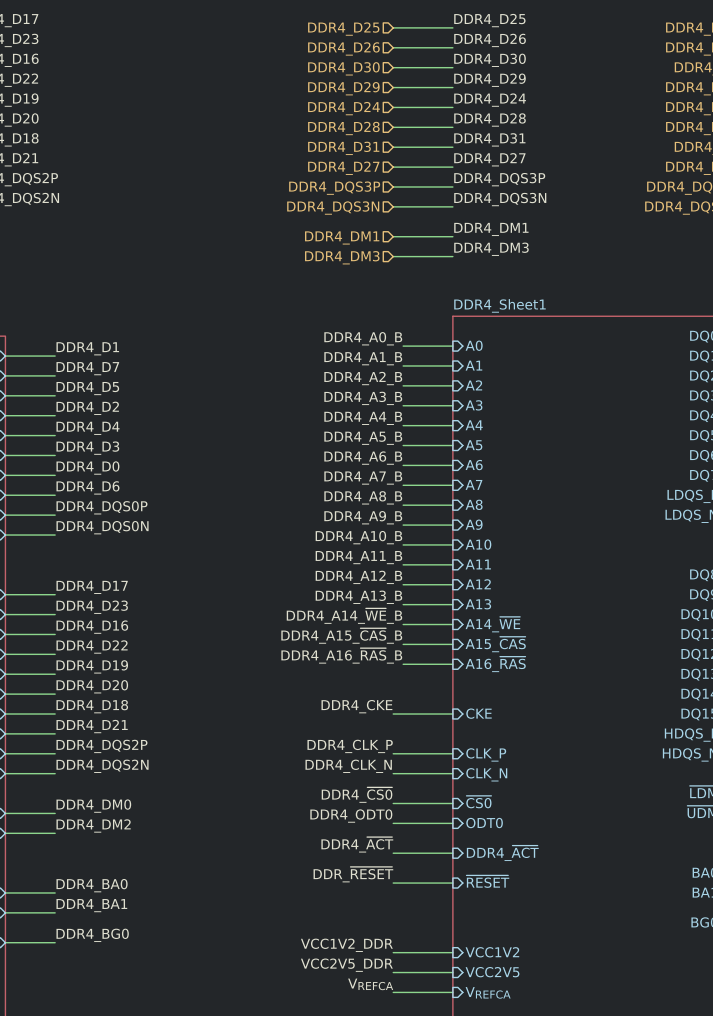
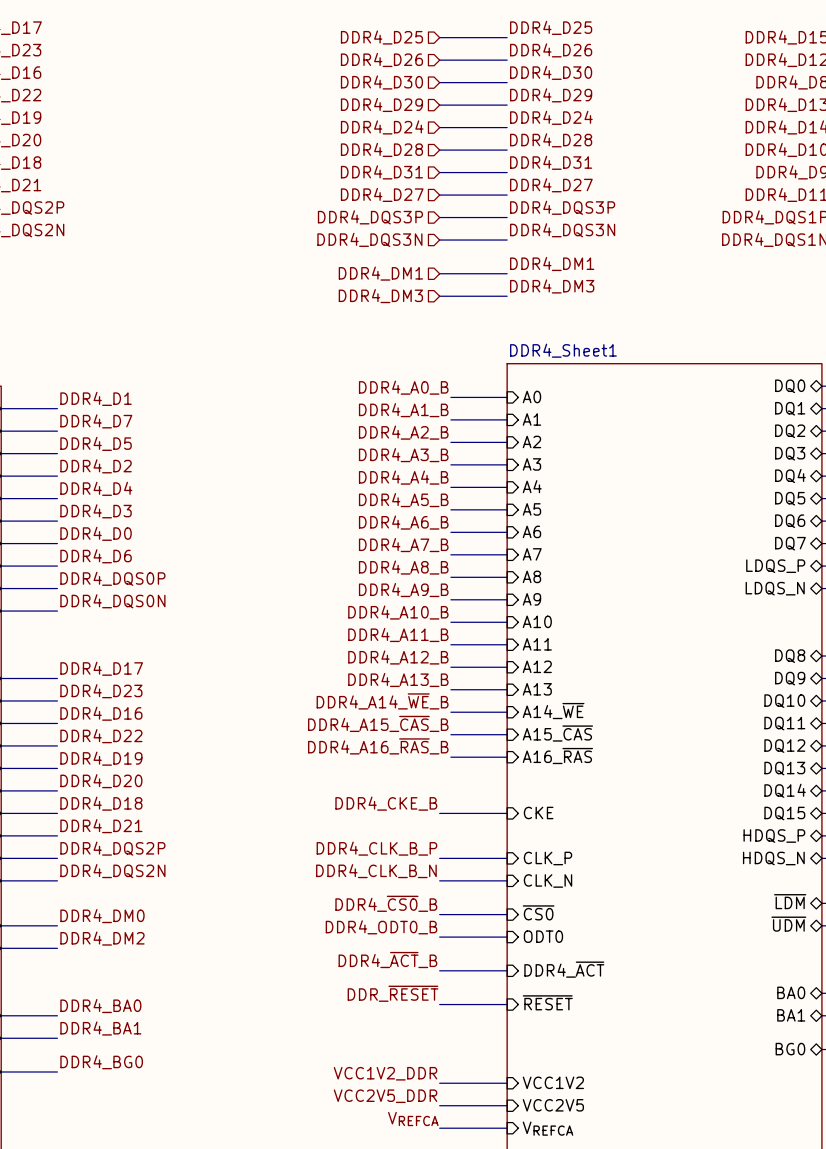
label: DDR4_CKE (356, 706) -> DDR4_CKE_B (386, 803)
label: DDR4_CLK_P (350, 746) -> DDR4_CLK_B_P (376, 848)
label: DDR4_CLK_N (348, 766) -> DDR4_CLK_B_N (376, 871)
label: DDR4_~{CS0} (357, 795) -> DDR4_~{CS0}_B (386, 903)
label: DDR4_ODT0 (351, 816) -> DDR4_ODT0_B (381, 927)
label: DDR4_~{ACT} (357, 844) -> DDR4_~{ACT}_B (387, 960)

